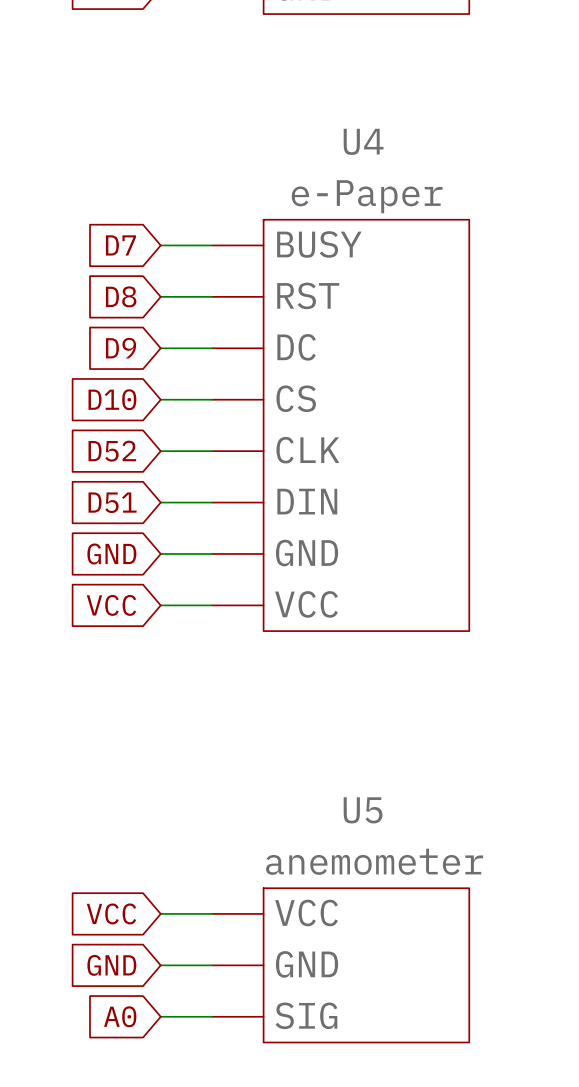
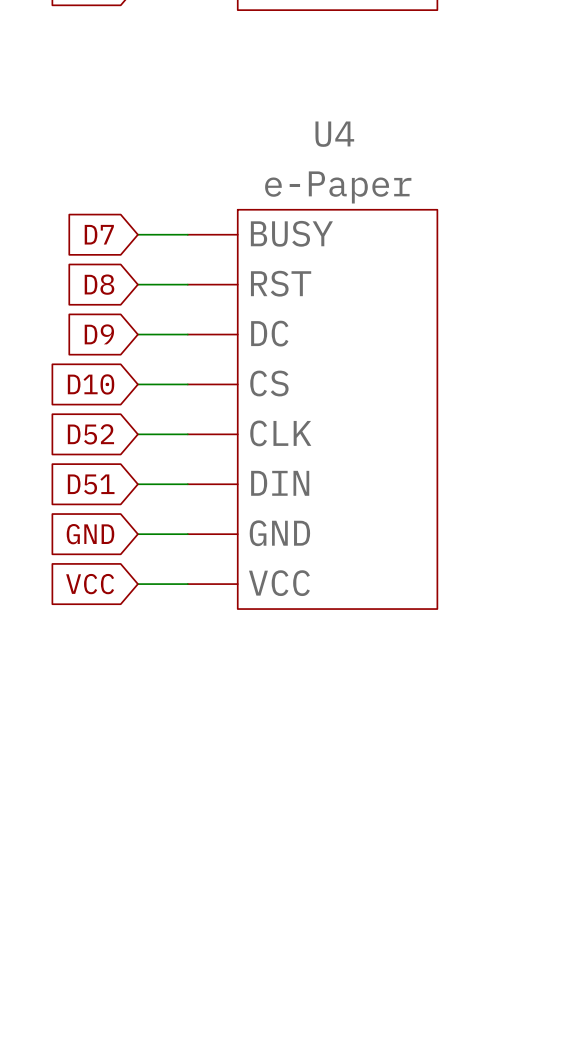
global label: VCC (111, 913) -> none
wire: (160, 913) (212, 913) -> none
global label: GND (111, 965) -> none
wire: (160, 965) (212, 965) -> none
U5: anemometer (340, 965) -> none
global label: A0 (120, 1016) -> none
wire: (160, 1016) (212, 1016) -> none

